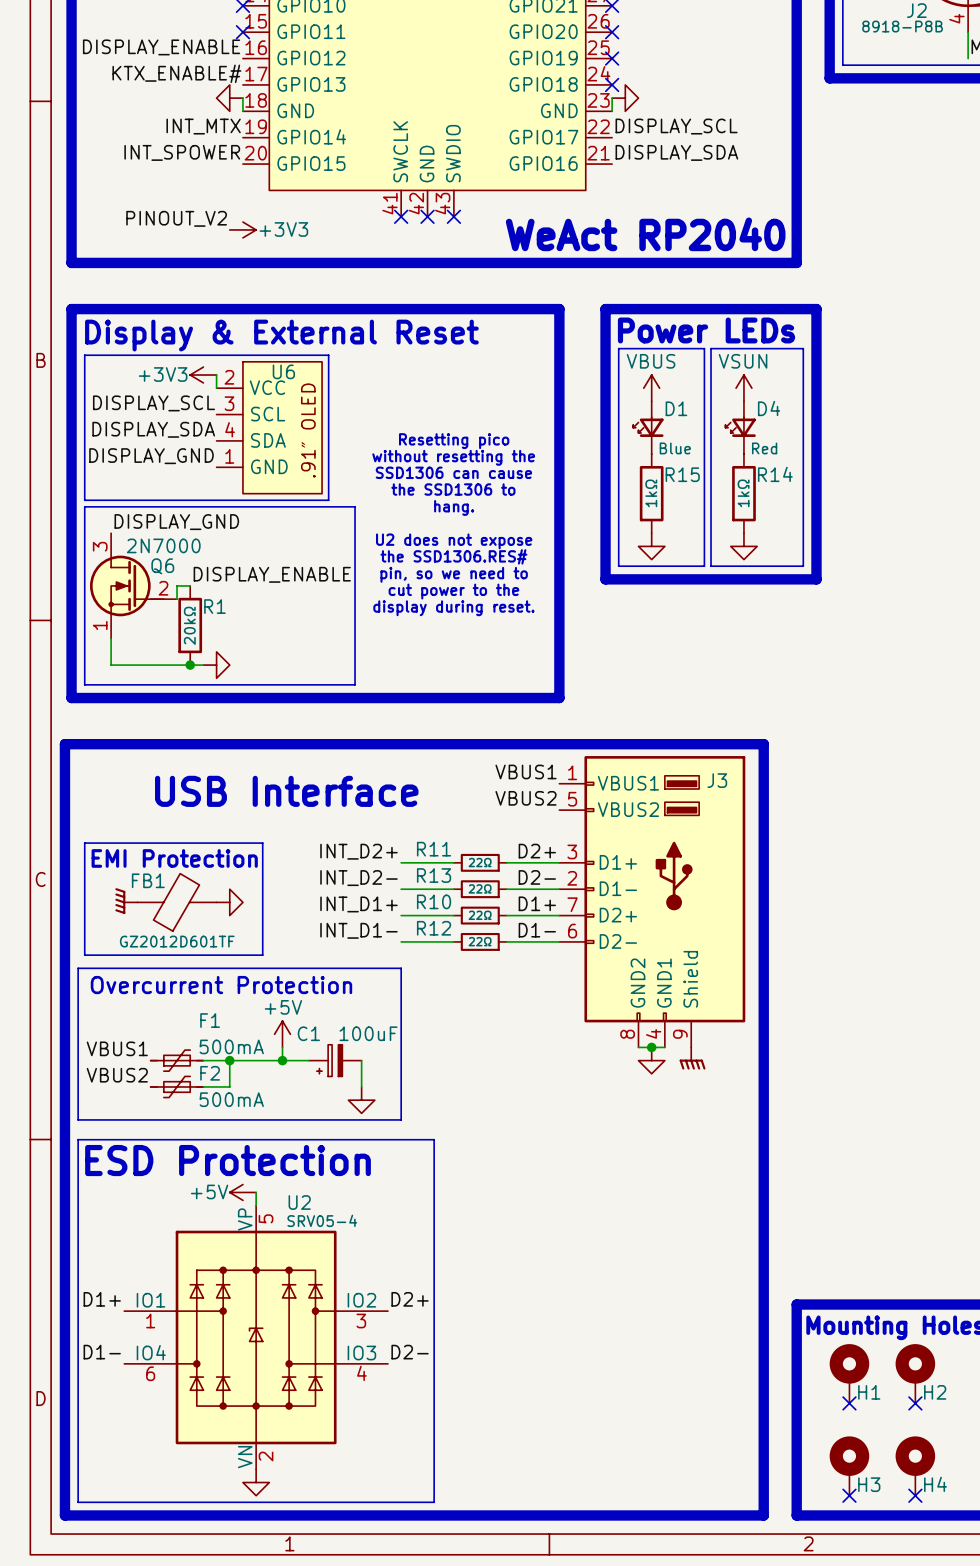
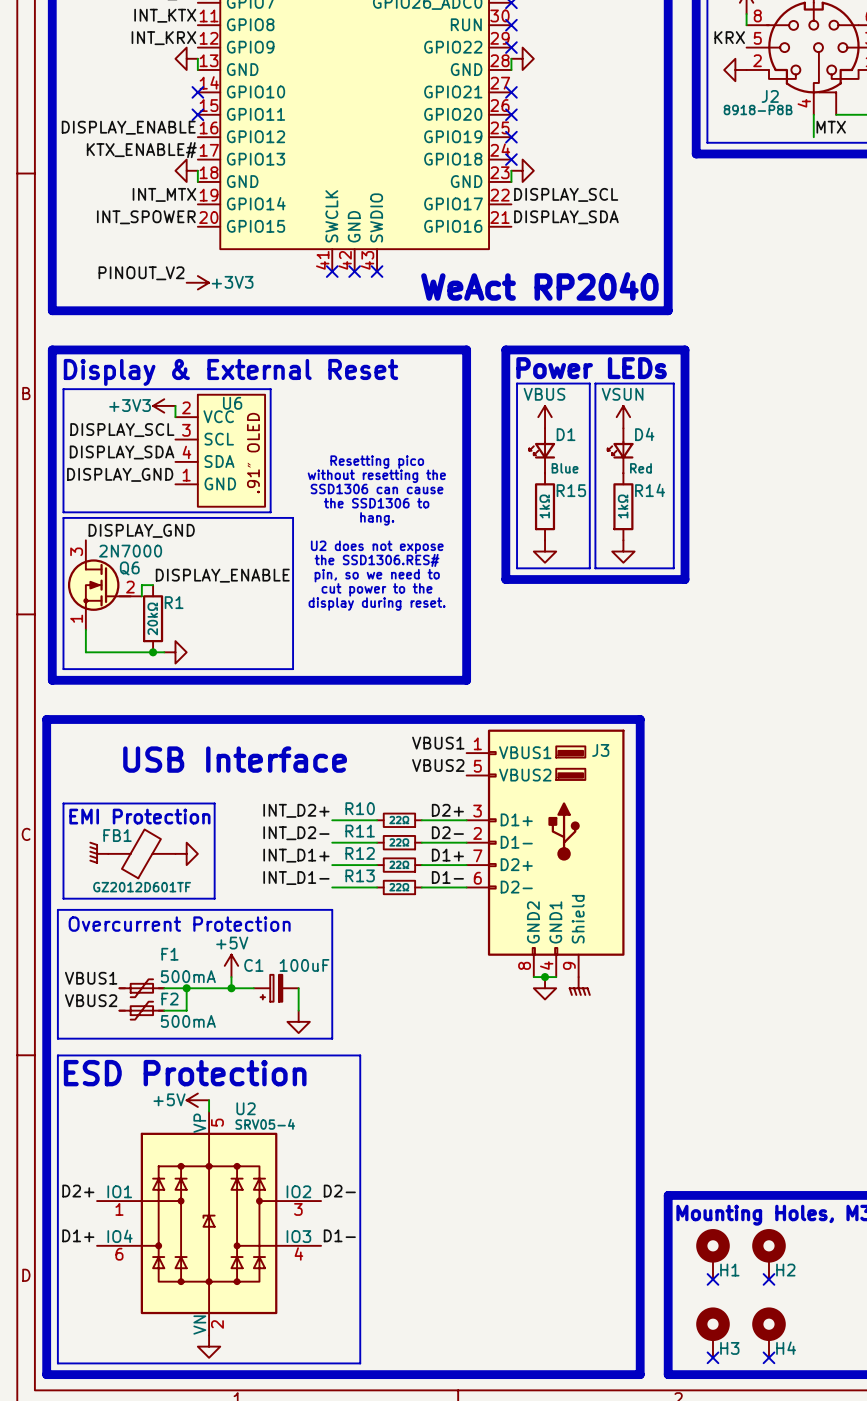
R11 name: R11 (434, 849) -> R10 (360, 808)
R13 name: R13 (434, 875) -> R11 (360, 831)
R10 name: R10 (434, 901) -> R12 (360, 853)
R12 name: R12 (434, 928) -> R13 (360, 875)
label: D1+ (102, 1299) -> D2+ (78, 1191)
label: D2+ (410, 1299) -> D2- (339, 1191)
label: D1- (102, 1352) -> D1+ (78, 1235)
label: D2- (410, 1352) -> D1- (339, 1235)

